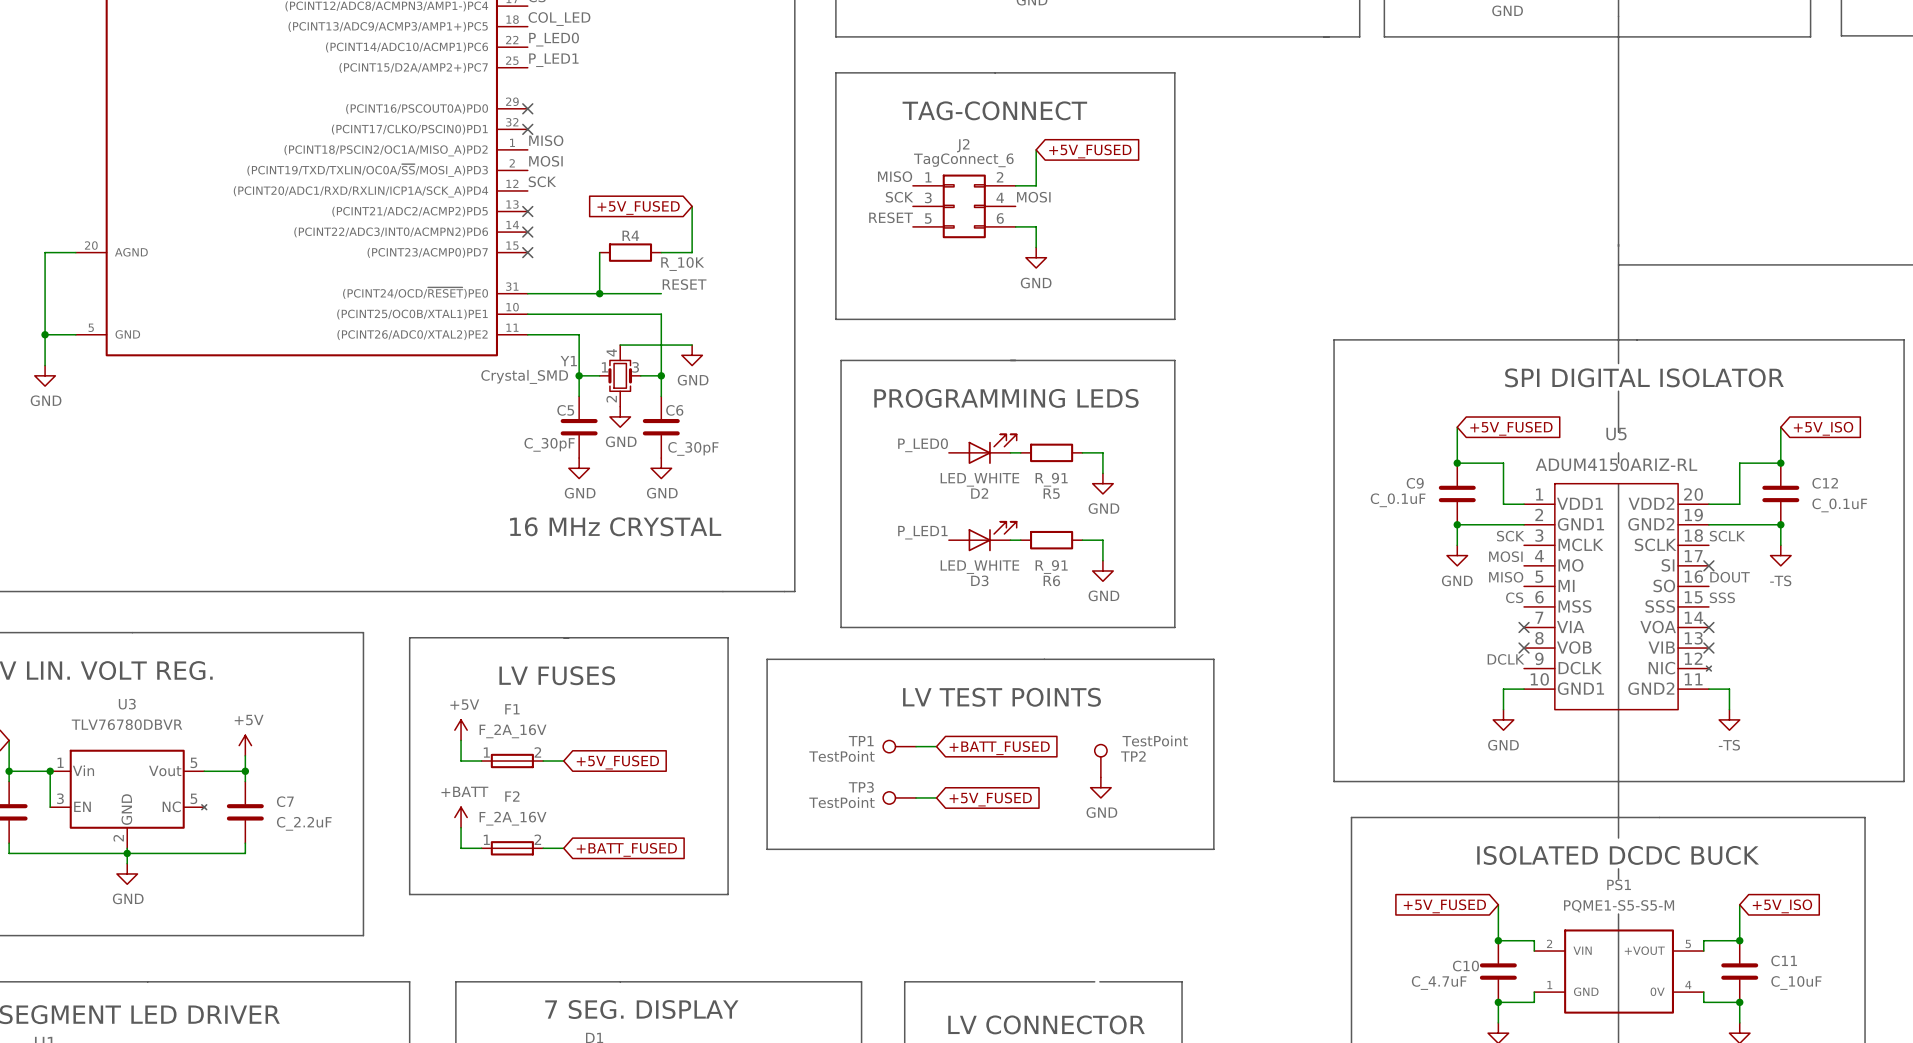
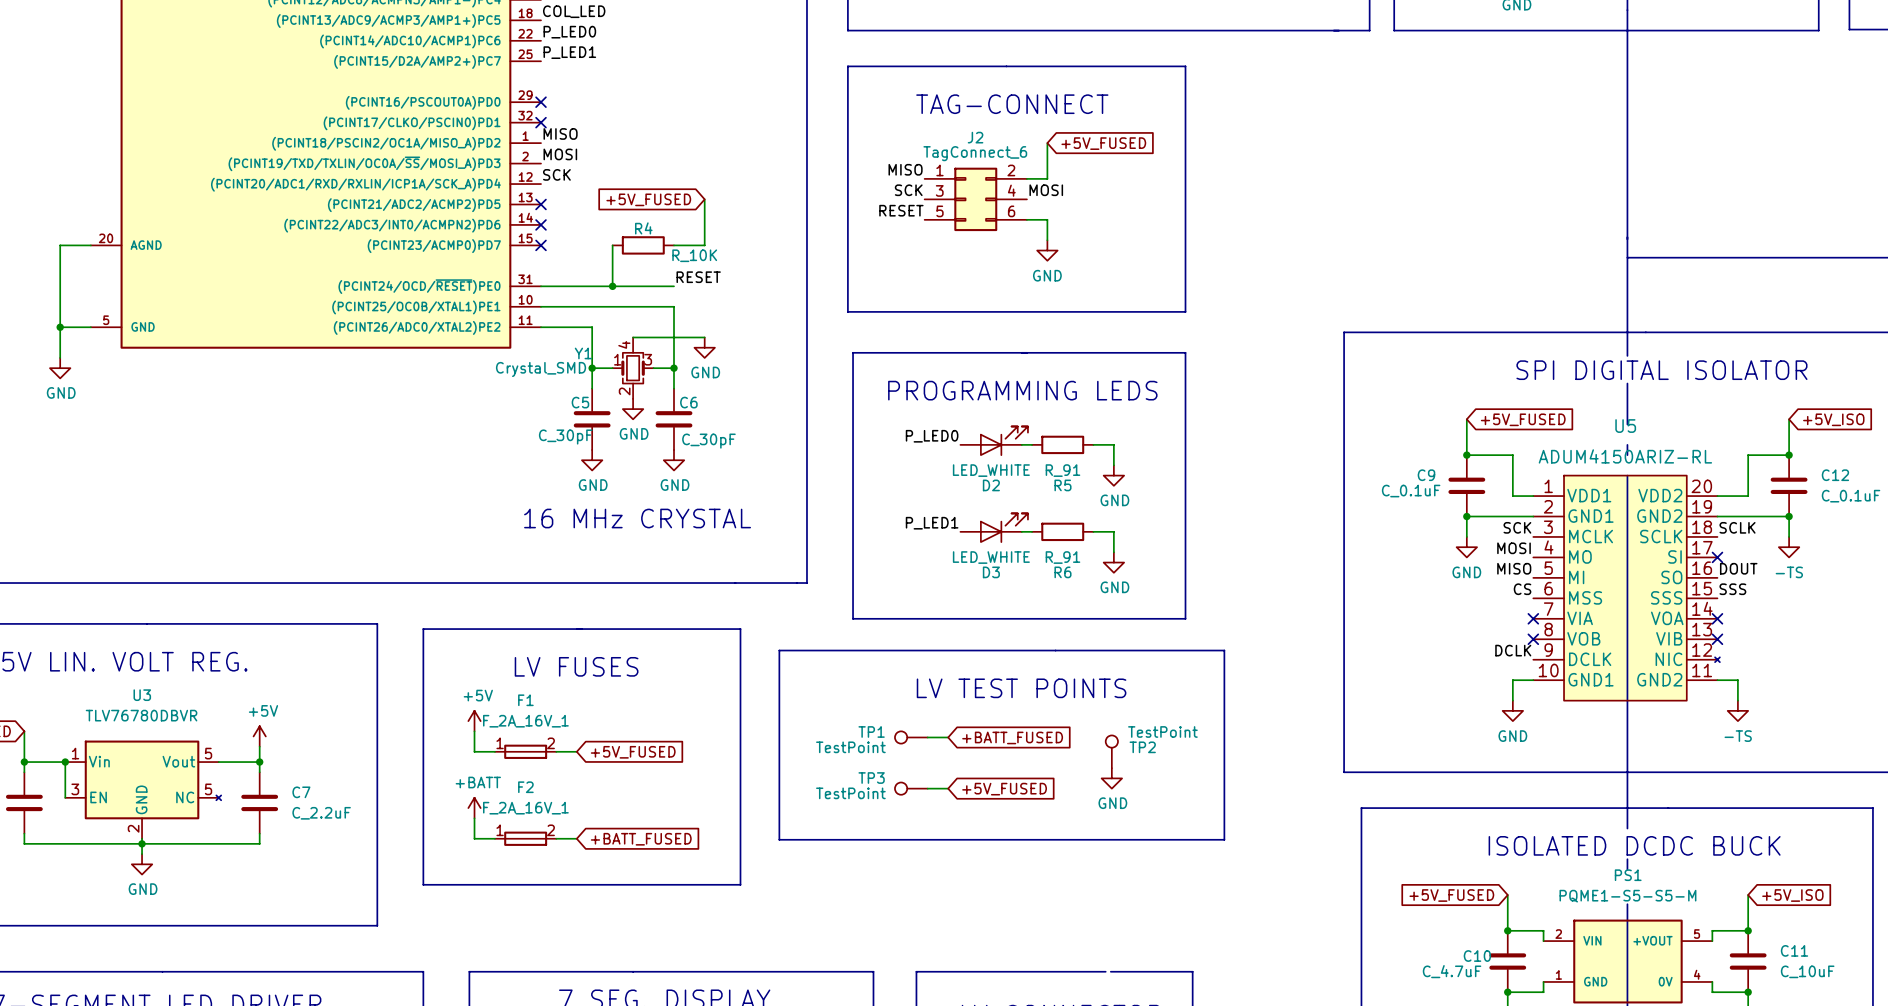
F1 value: F_2A_16V (513, 731) -> F_2A_16V_1 (525, 721)
F2 value: F_2A_16V (513, 818) -> F_2A_16V_1 (525, 808)

